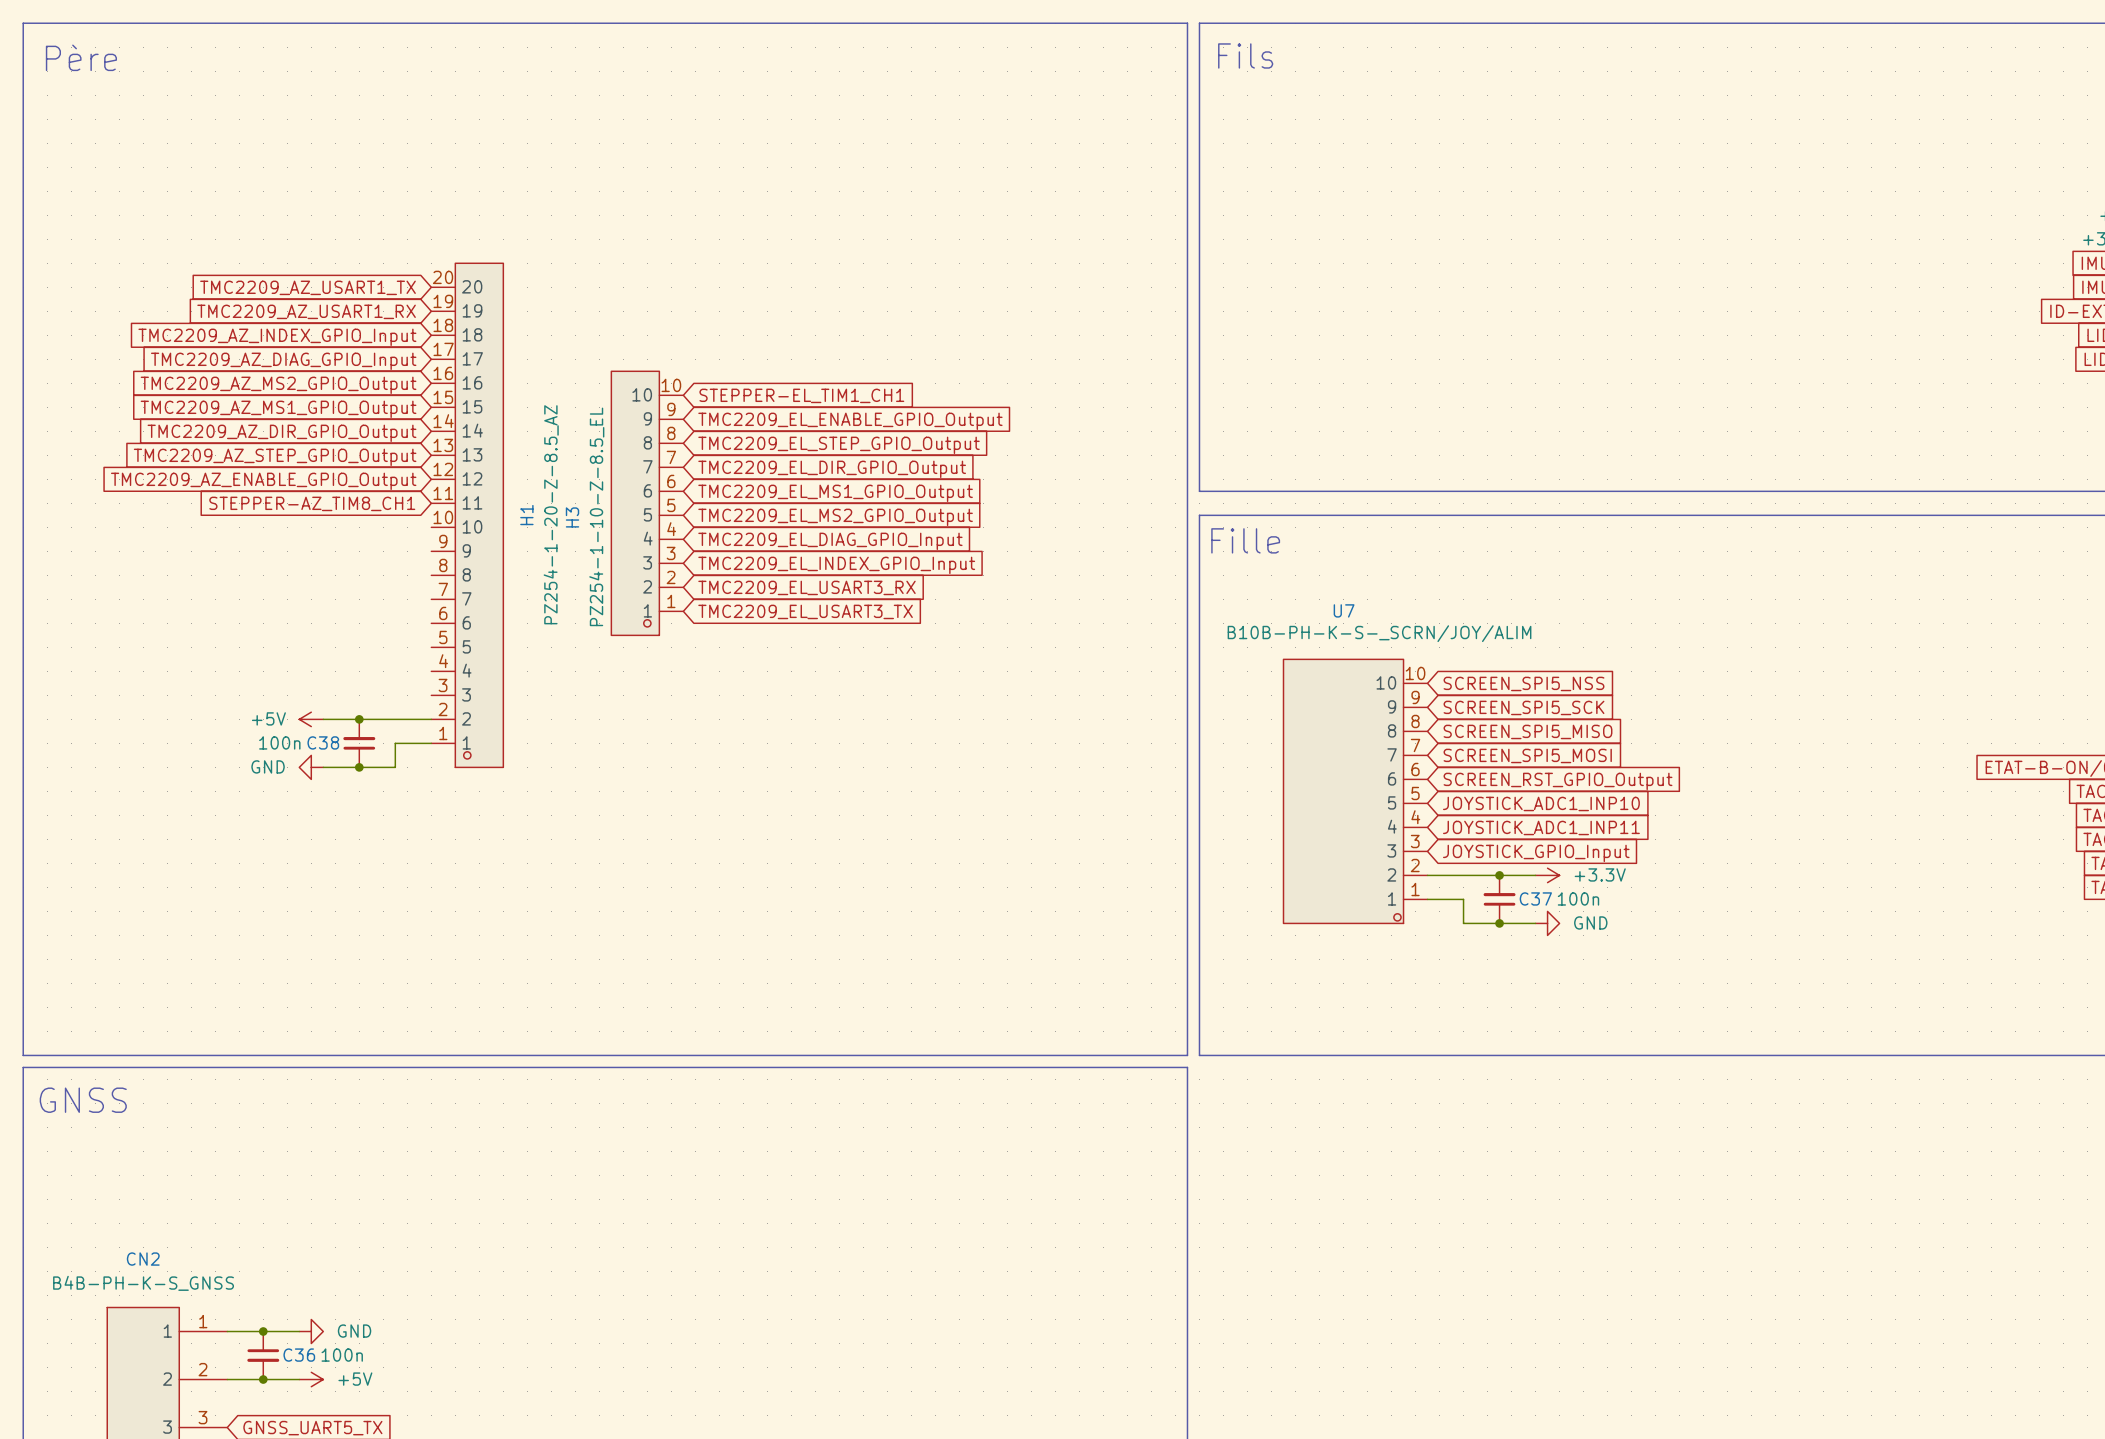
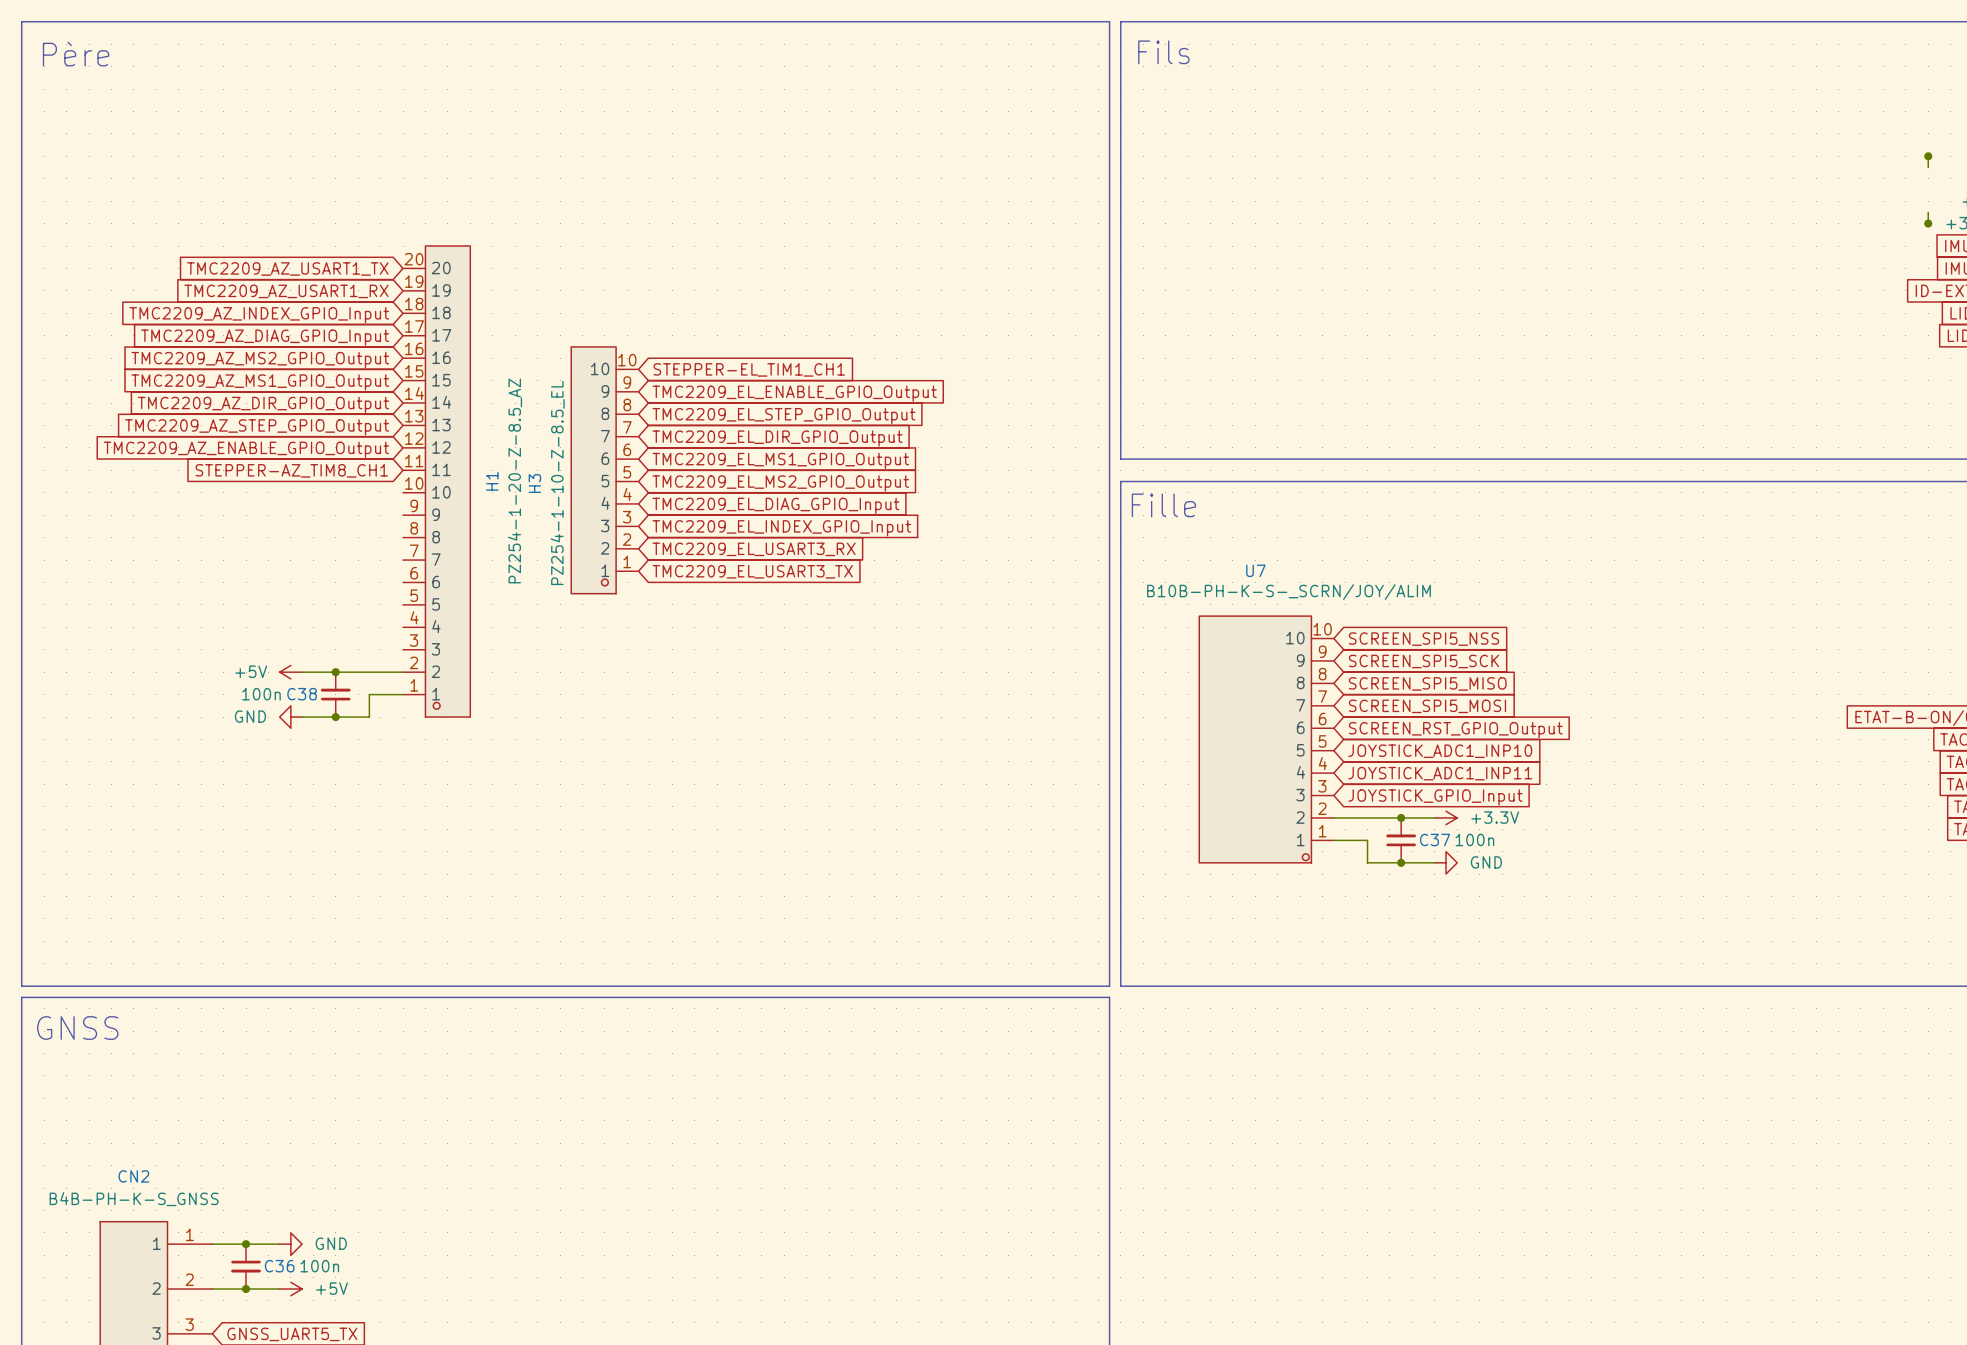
wire: none -> (1928, 156) (1928, 167)
junction: none -> (1928, 156)
wire: none -> (1928, 212) (1928, 223)
junction: none -> (1928, 223)

